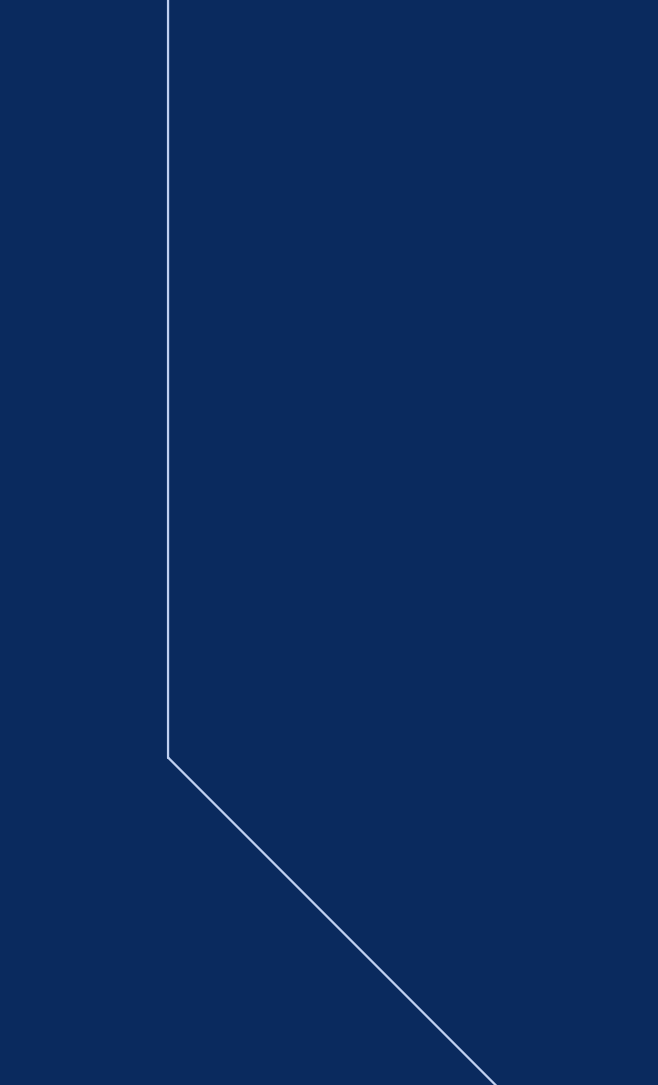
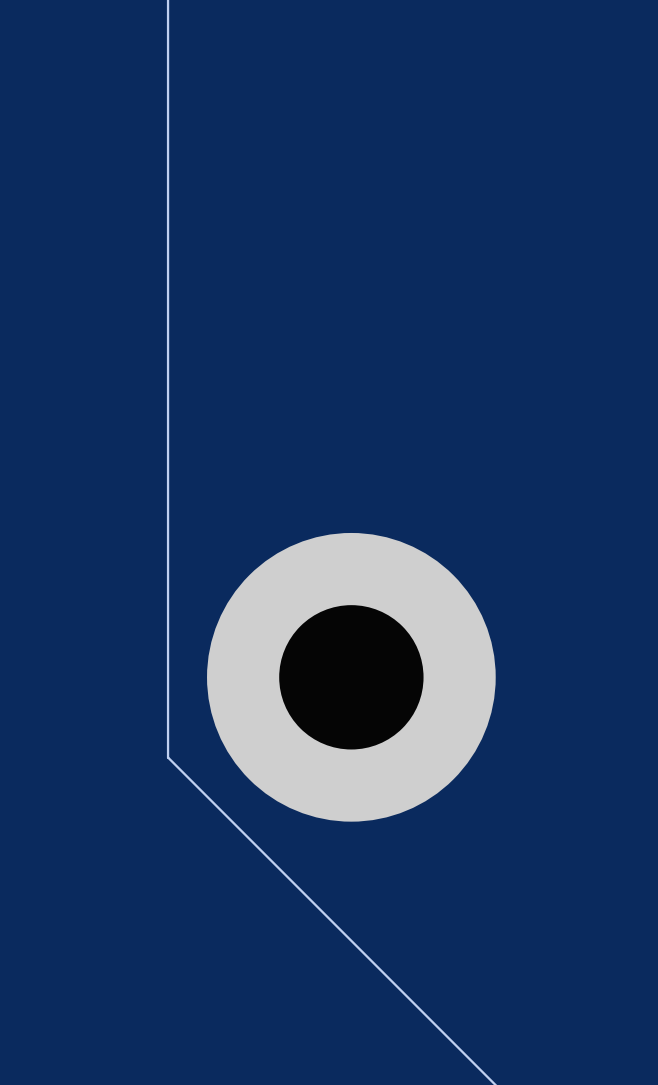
part: none -> (351, 677)

